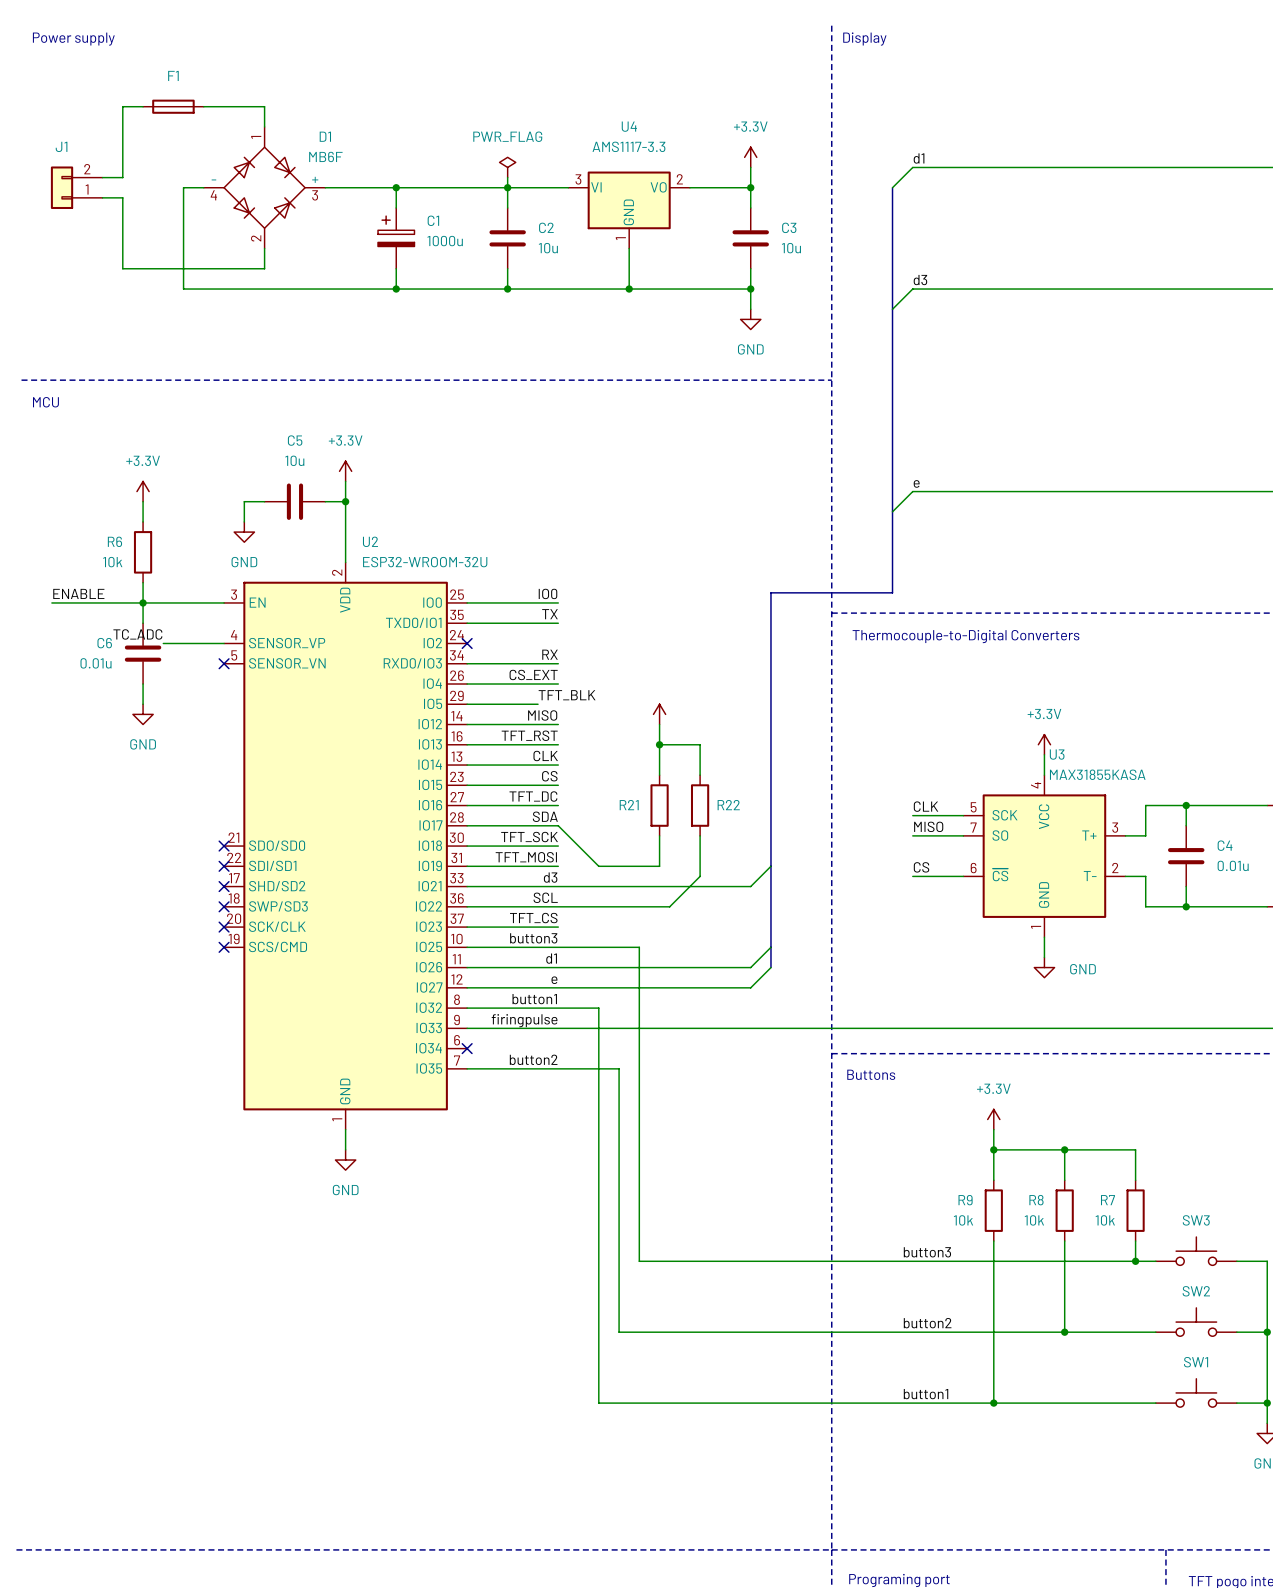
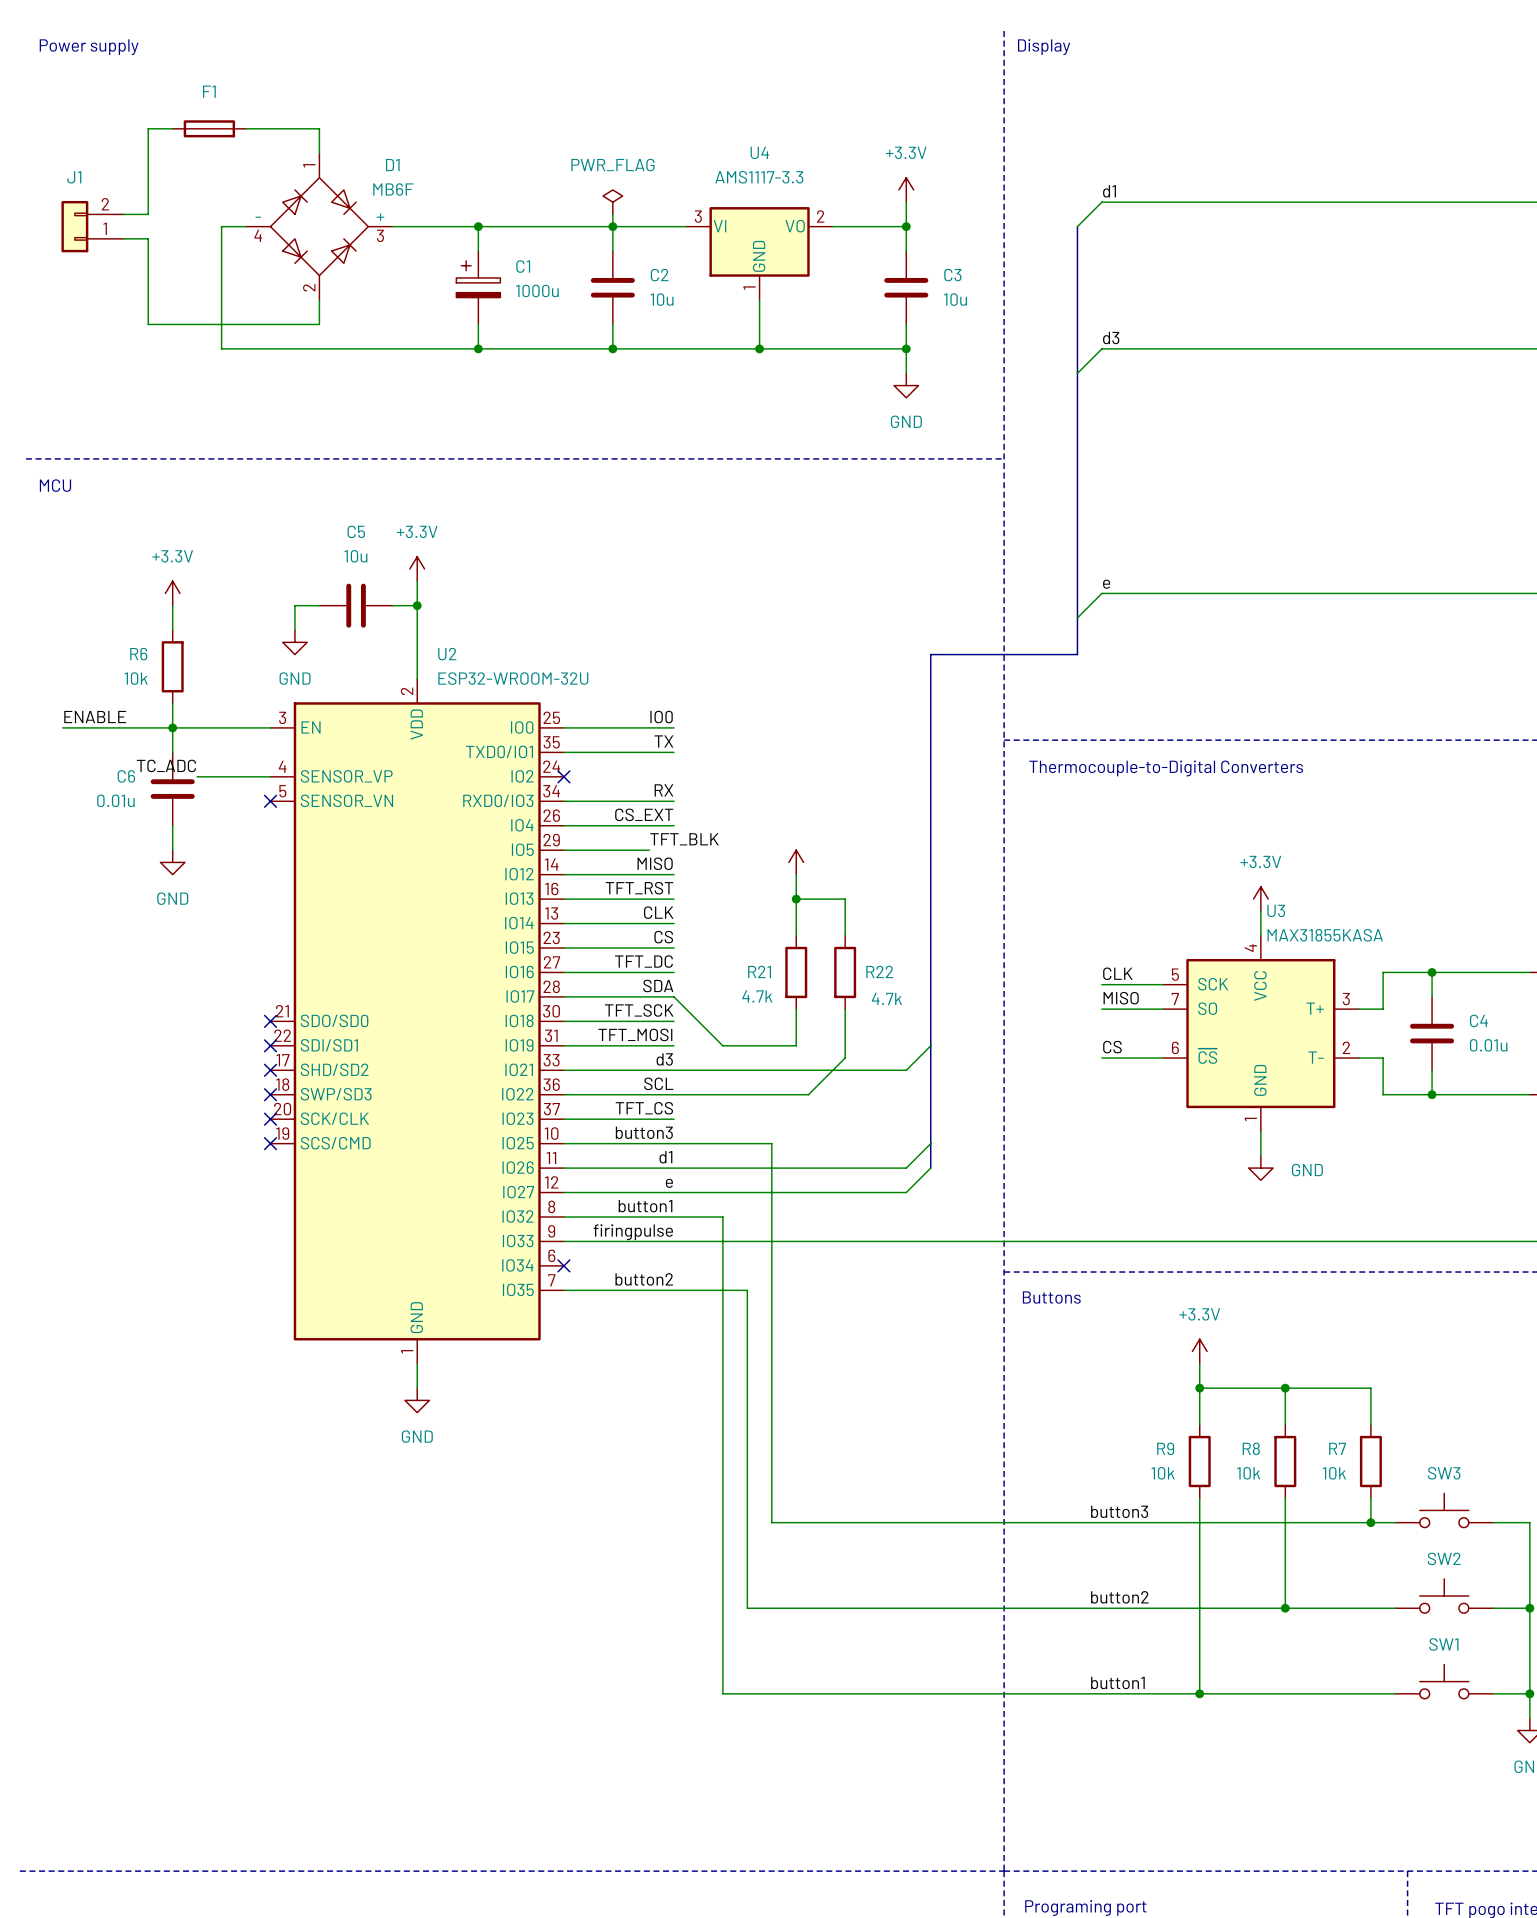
bus: (892, 542) (892, 592) (770, 592) -> (1077, 654) (930, 654) (930, 715)
R21 value: none -> 4.7k (757, 996)
R22 value: none -> 4.7k (886, 998)

